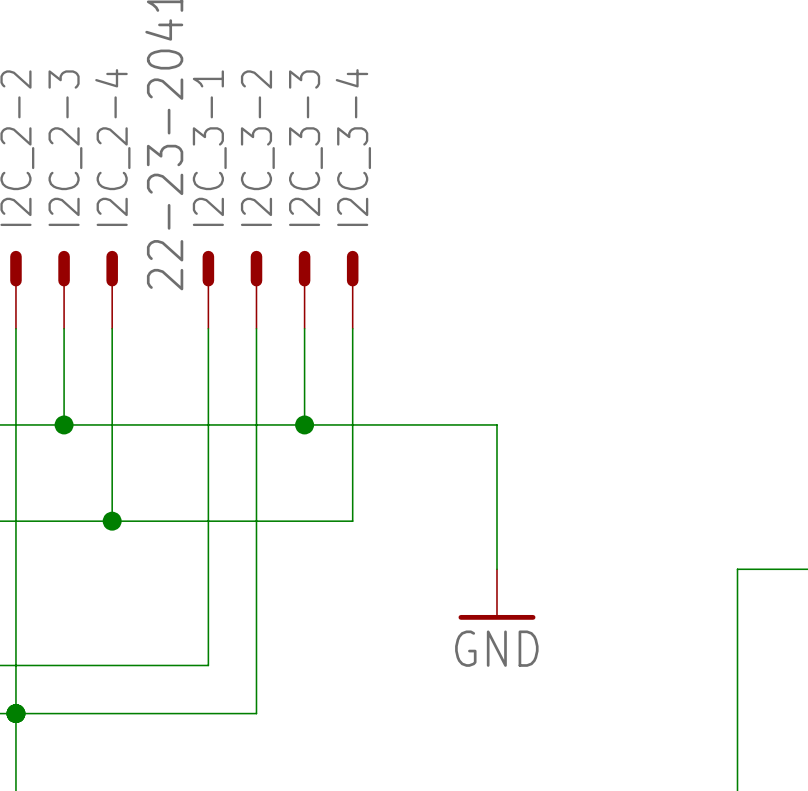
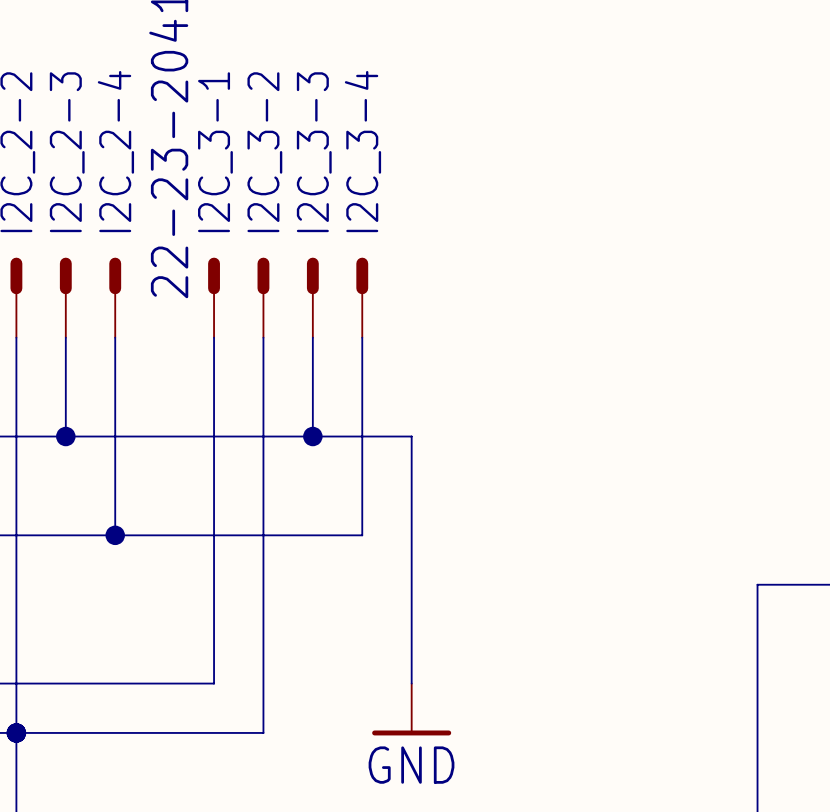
wire: (400, 424) (496, 424) (496, 569) -> (411, 436) (411, 683)
power symbol position: GND (496, 594) -> GND (411, 709)

